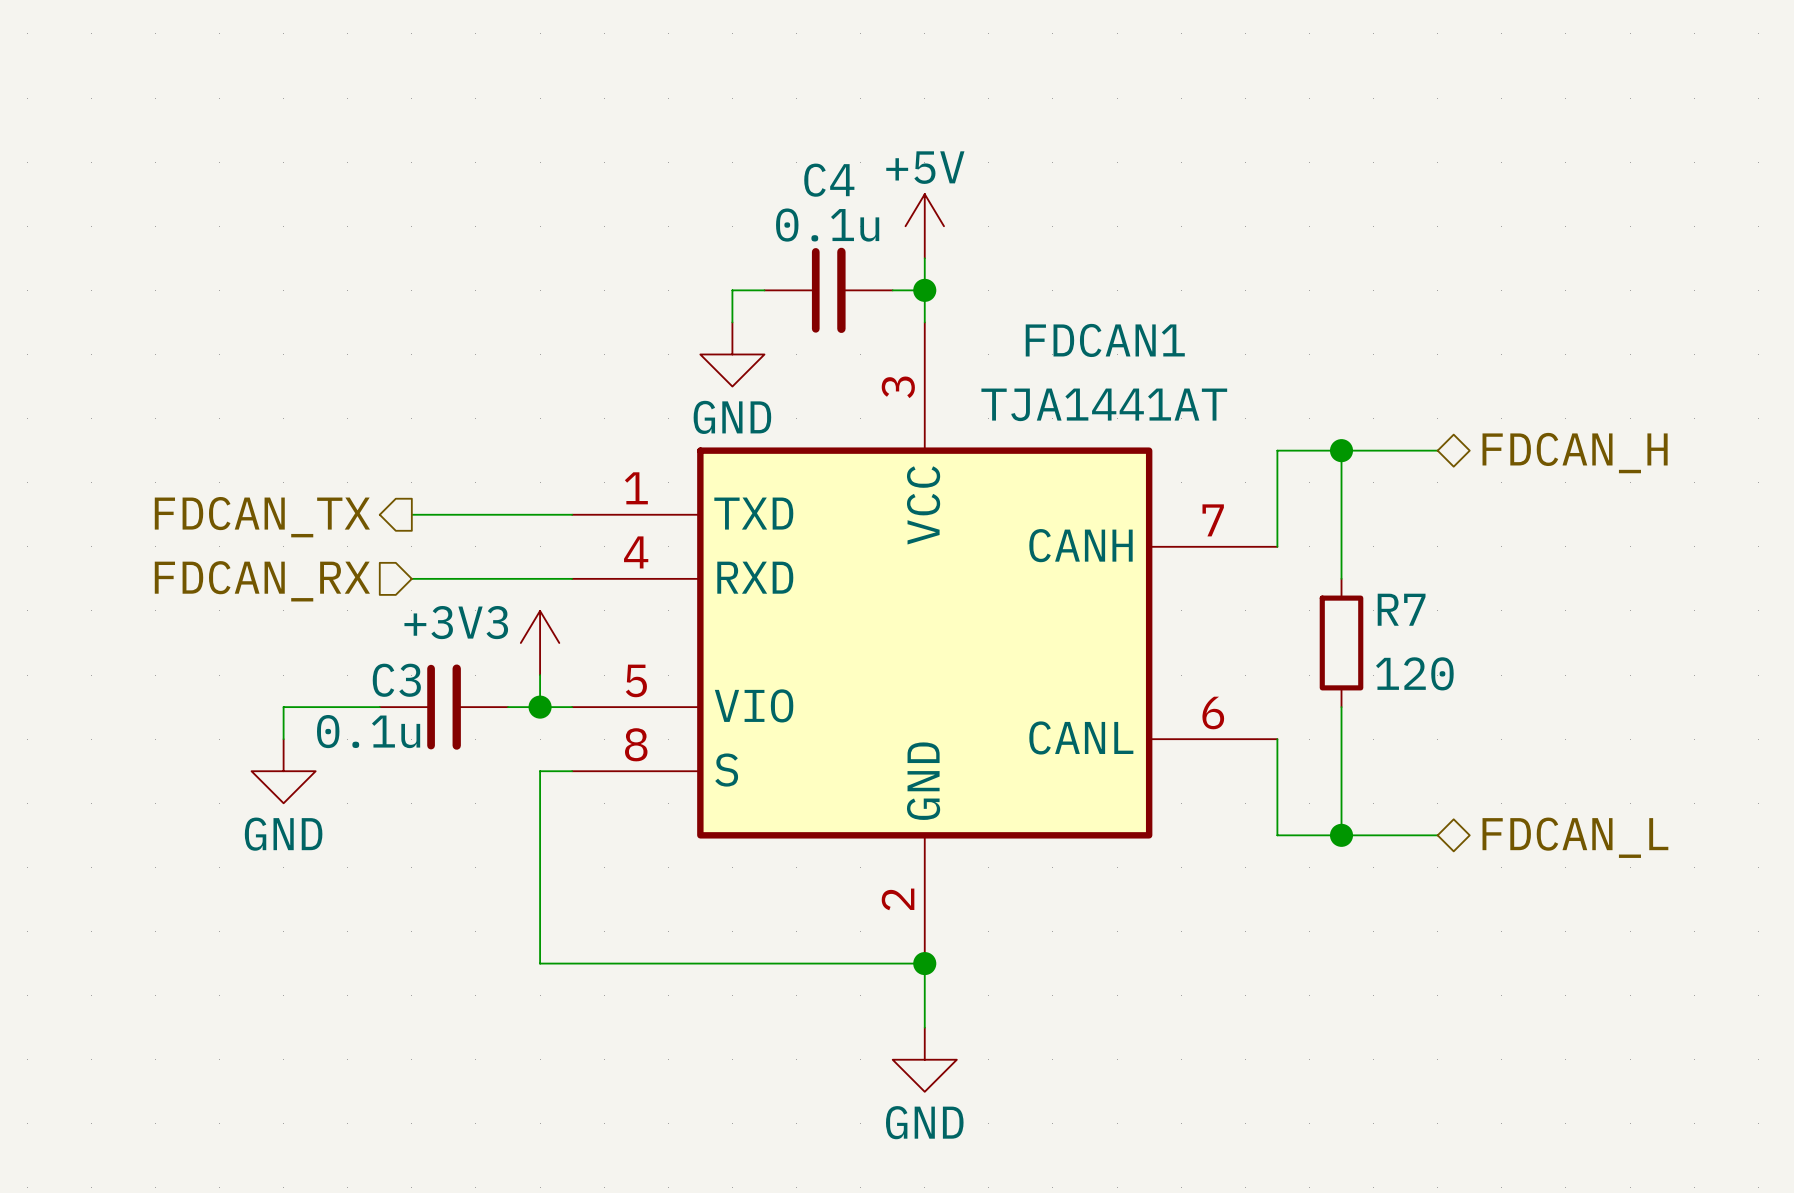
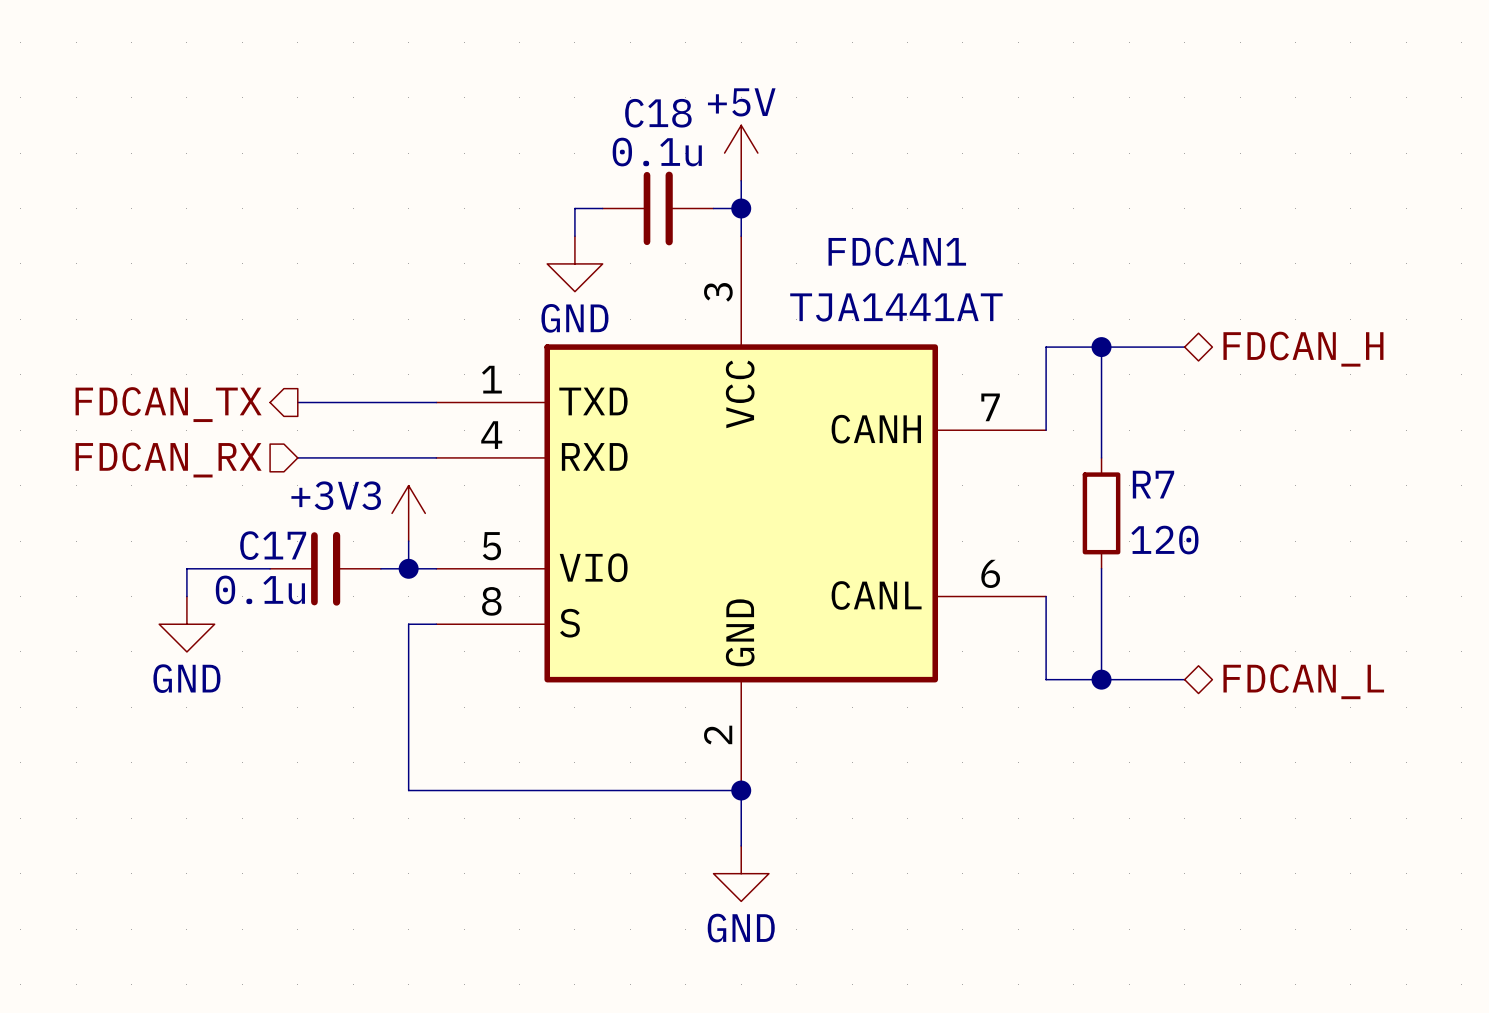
C4 name: C4 (829, 180) -> C18 (658, 113)
C3 name: C3 (396, 680) -> C17 (273, 545)

